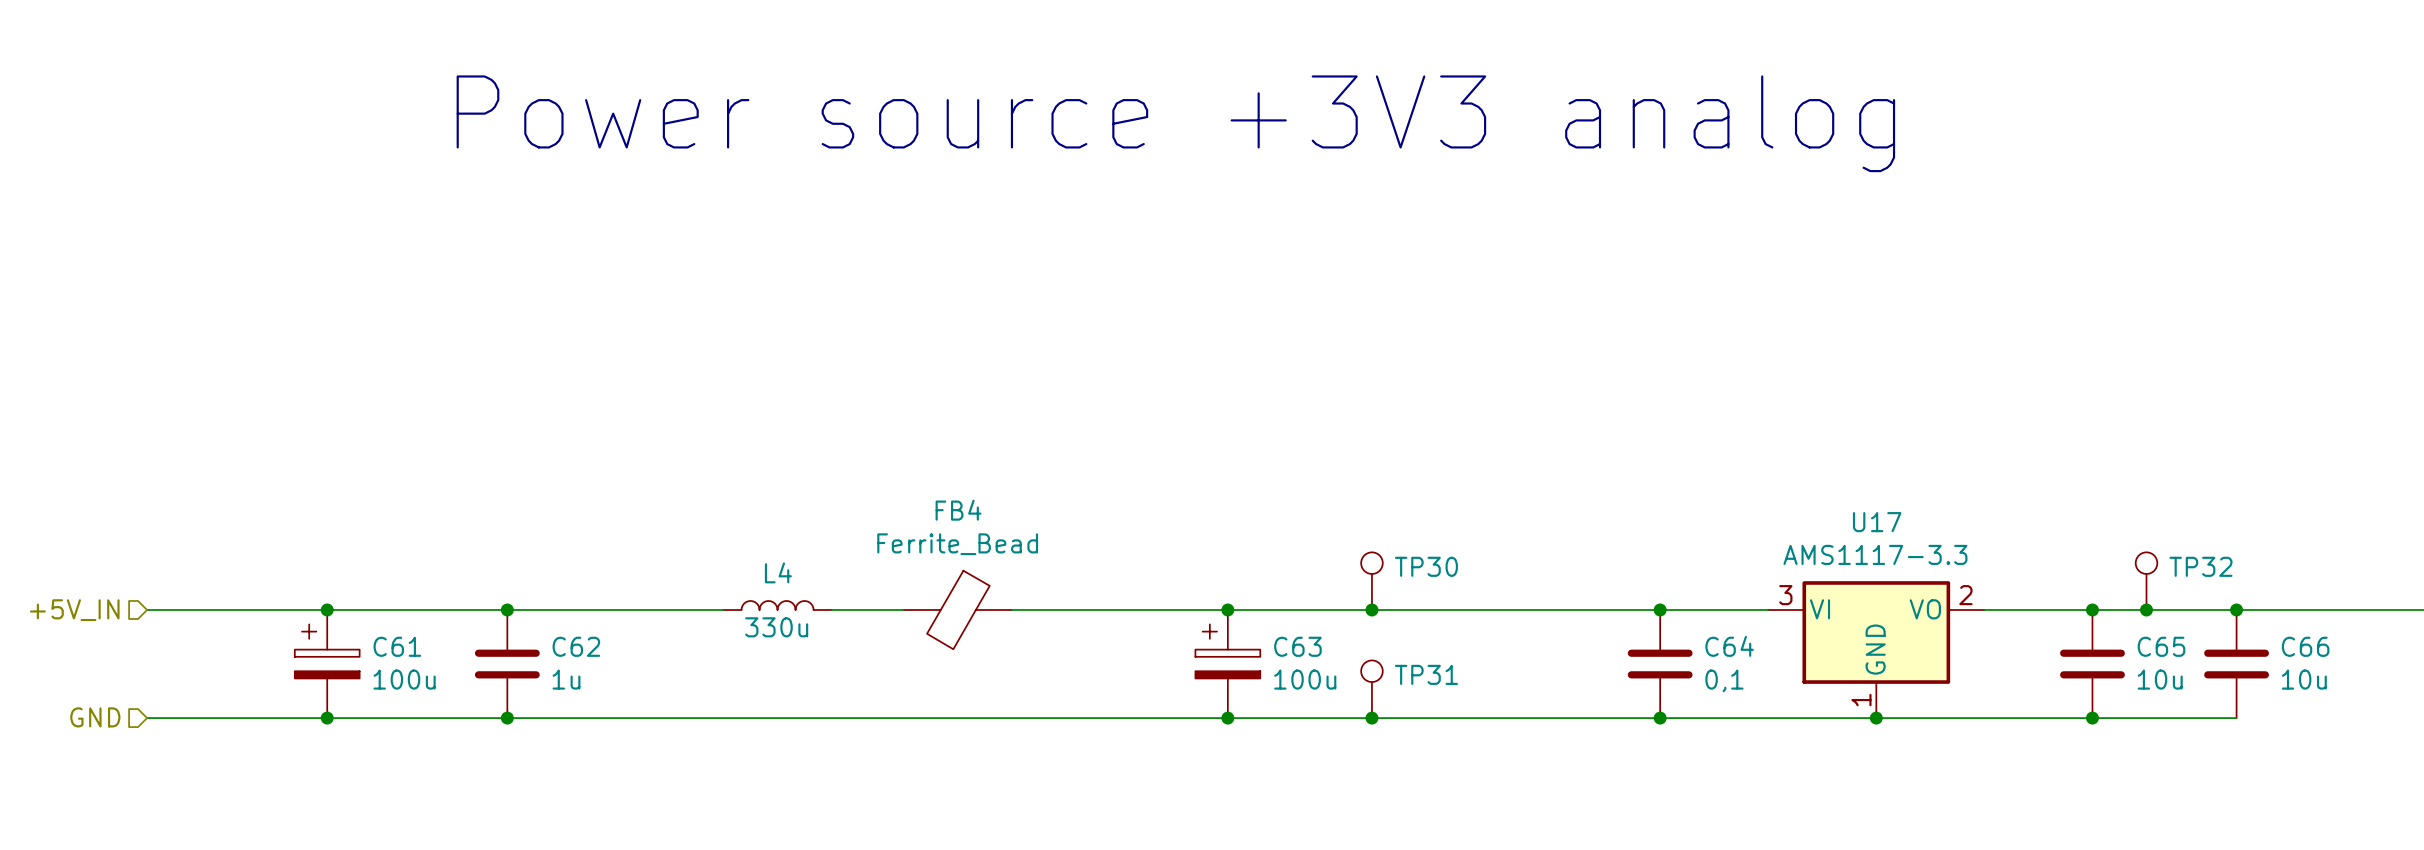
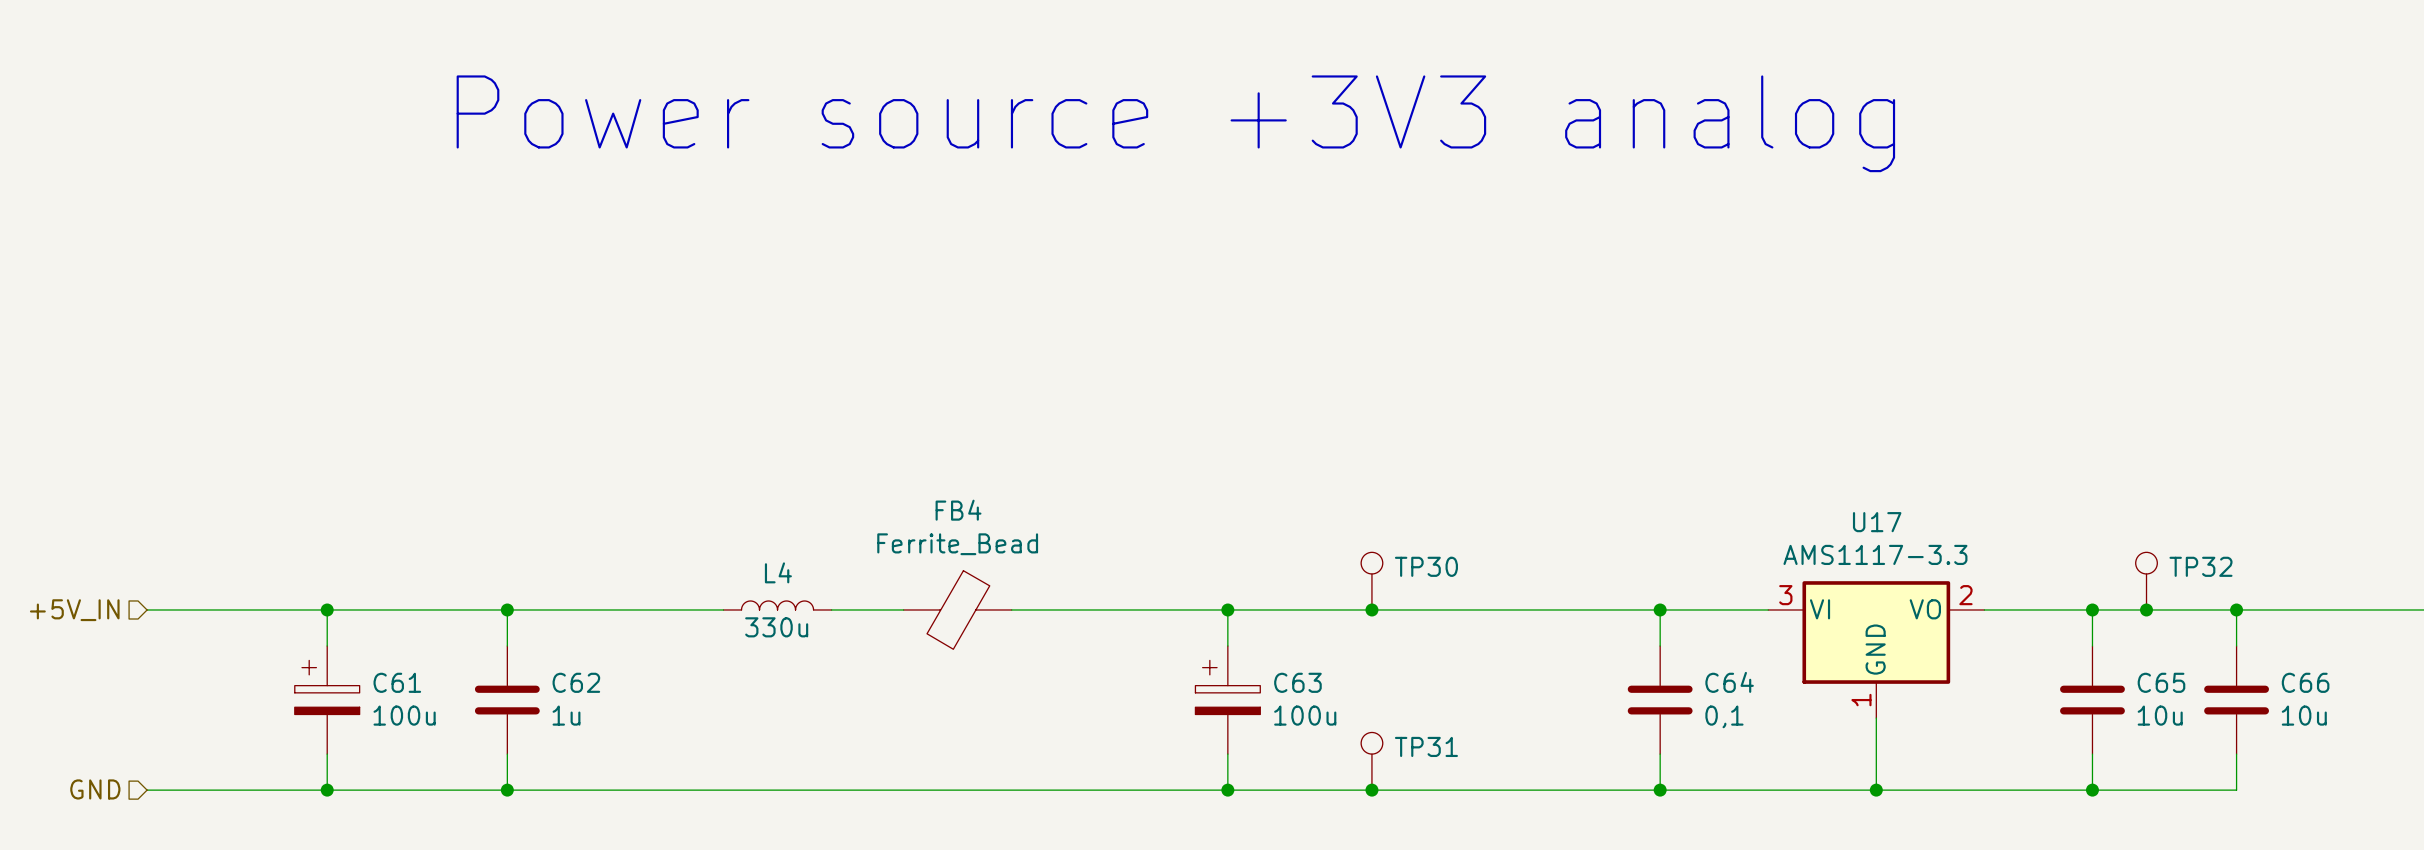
C61 position: (327, 664) -> (327, 700)
C62 position: (507, 664) -> (507, 700)
C63 position: (1227, 664) -> (1227, 700)
C64 position: (1660, 664) -> (1660, 700)
C65 position: (2092, 664) -> (2092, 700)
C66 position: (2236, 664) -> (2236, 700)
TP31 position: (1371, 689) -> (1371, 761)
hierarchical label position: GND (95, 717) -> GND (95, 789)
wire: (147, 718) (2236, 718) -> none
junction position: (327, 718) -> (327, 790)
junction position: (507, 718) -> (507, 790)
junction position: (1227, 718) -> (1227, 790)
junction position: (1371, 718) -> (1371, 790)
junction position: (1660, 718) -> (1660, 790)
wire: none -> (1876, 718) (1876, 790)
junction position: (1876, 718) -> (1876, 790)
junction position: (2092, 718) -> (2092, 790)
wire: none -> (327, 754) (327, 790)
wire: none -> (507, 754) (507, 790)
wire: none -> (1227, 754) (1227, 790)
wire: none -> (1660, 754) (1660, 790)
wire: none -> (2092, 754) (2092, 790)
wire: none -> (2236, 754) (2236, 790) (147, 790)

